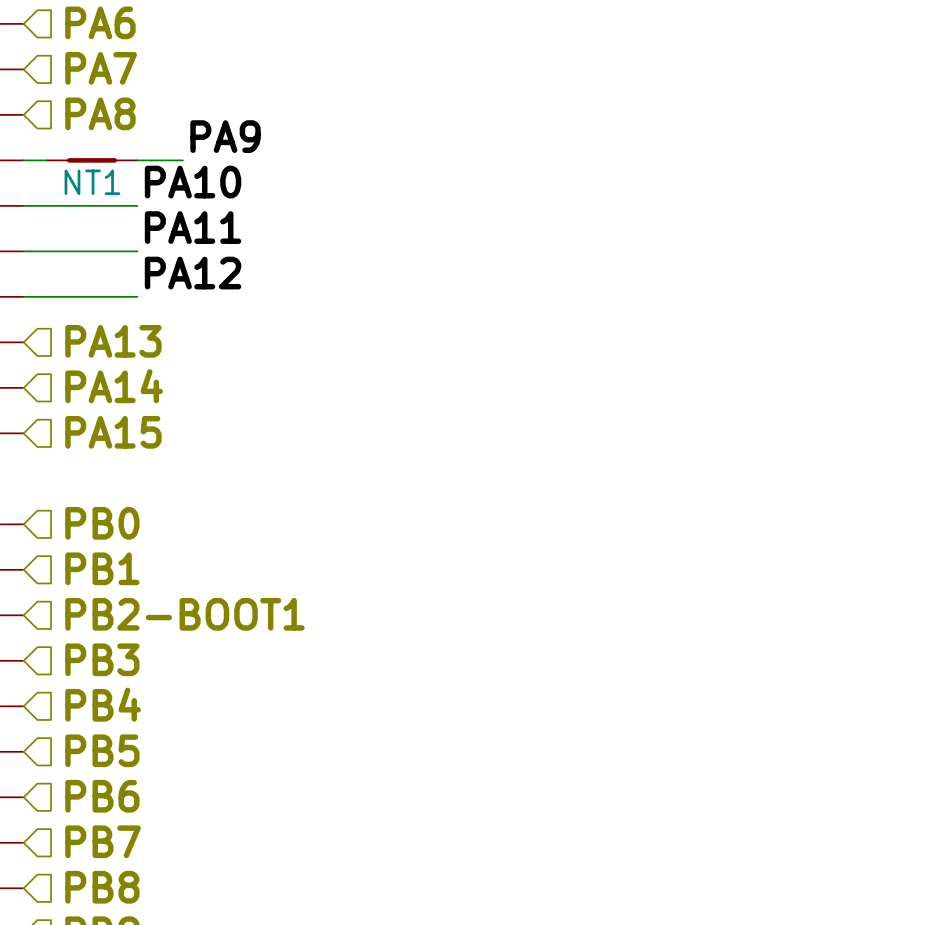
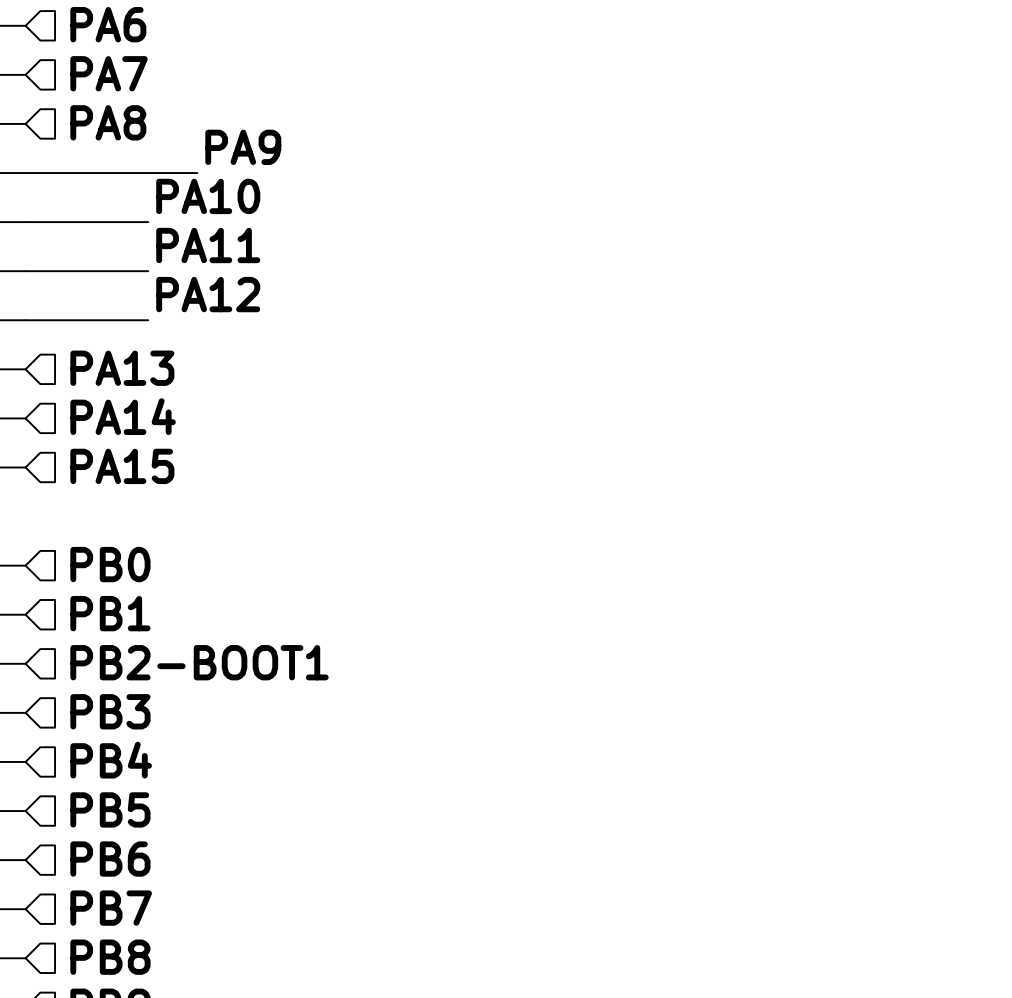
NT1: (91, 160) -> none

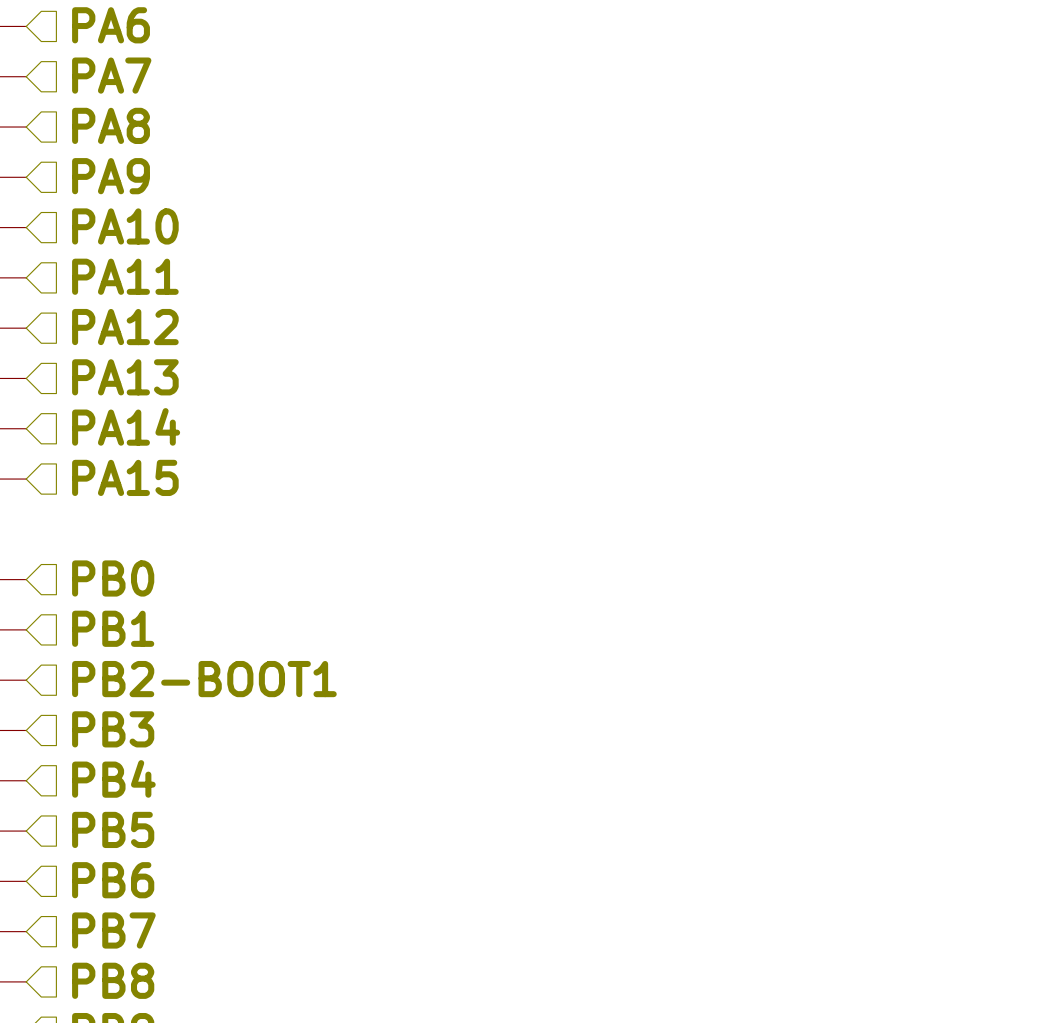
label: PA9 (243, 147) -> none
hierarchical label: none -> PA9 (111, 176)
wire: (25, 173) (197, 173) -> none
label: PA10 (208, 196) -> none
hierarchical label: none -> PA10 (125, 226)
wire: (25, 222) (148, 222) -> none
label: PA11 (208, 245) -> none
hierarchical label: none -> PA11 (125, 276)
wire: (25, 271) (148, 271) -> none
label: PA12 (208, 294) -> none
hierarchical label: none -> PA12 (125, 327)
wire: (25, 320) (148, 320) -> none

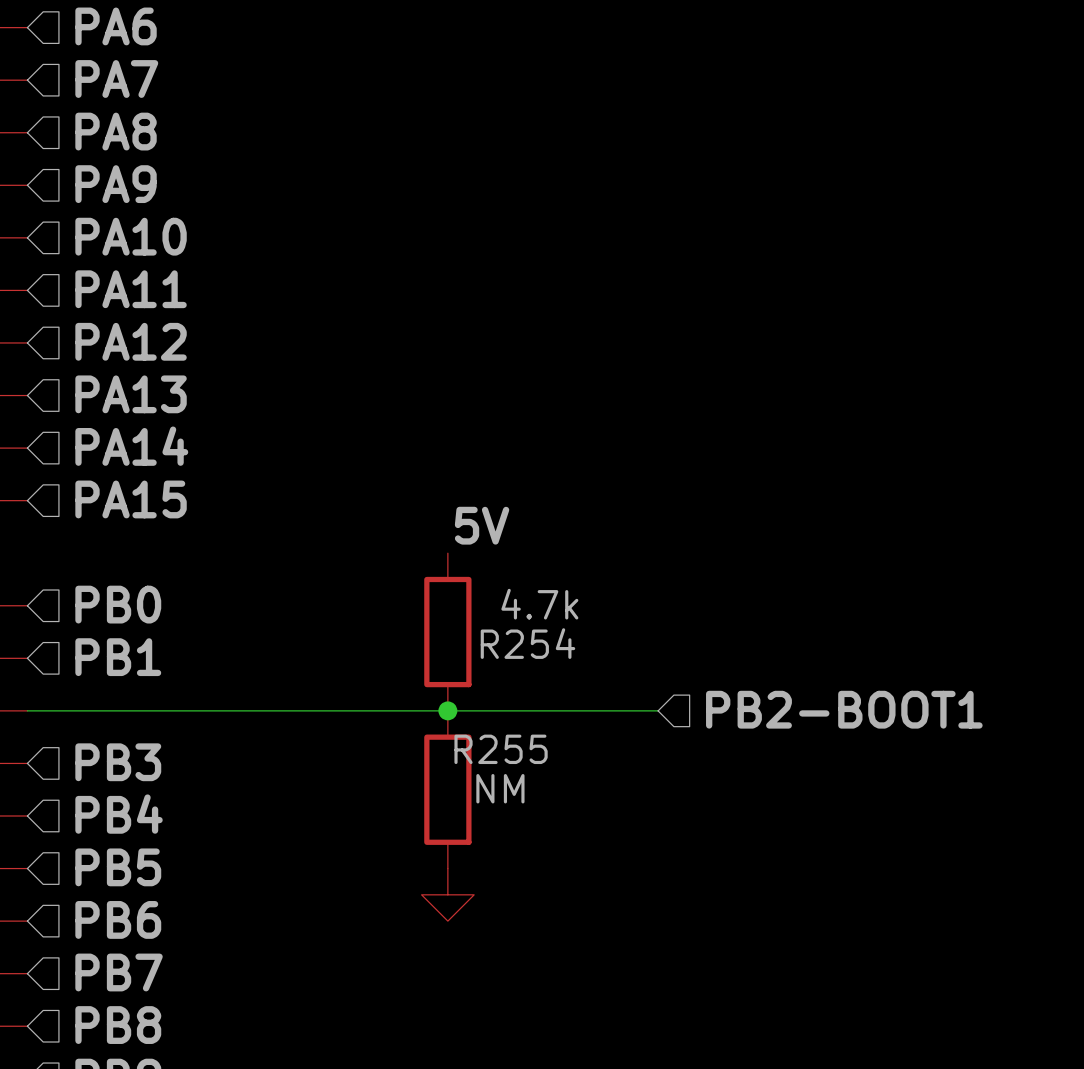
label: none -> 5V (482, 525)
R254: none -> 4.7k (447, 632)
hierarchical label: PB2-BOOT1 (204, 679) -> none
hierarchical label: none -> PB2-BOOT1 (844, 709)
wire: none -> (27, 710) (658, 710)
junction: none -> (447, 710)
R255: none -> NM (447, 789)
power symbol: none -> (447, 894)

